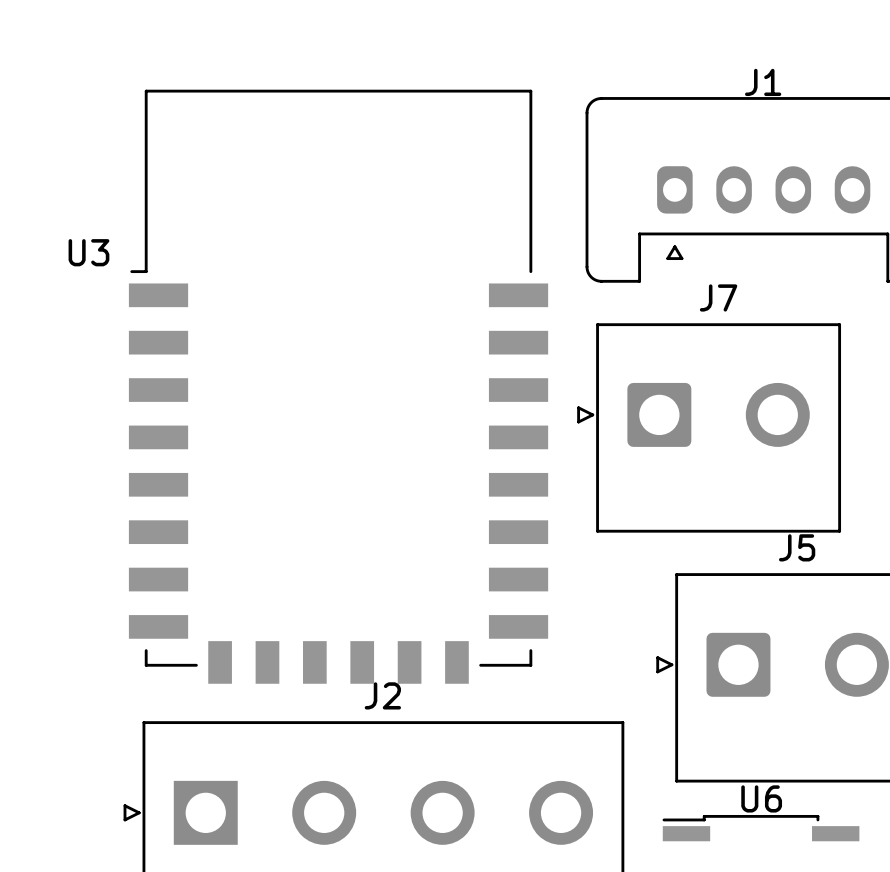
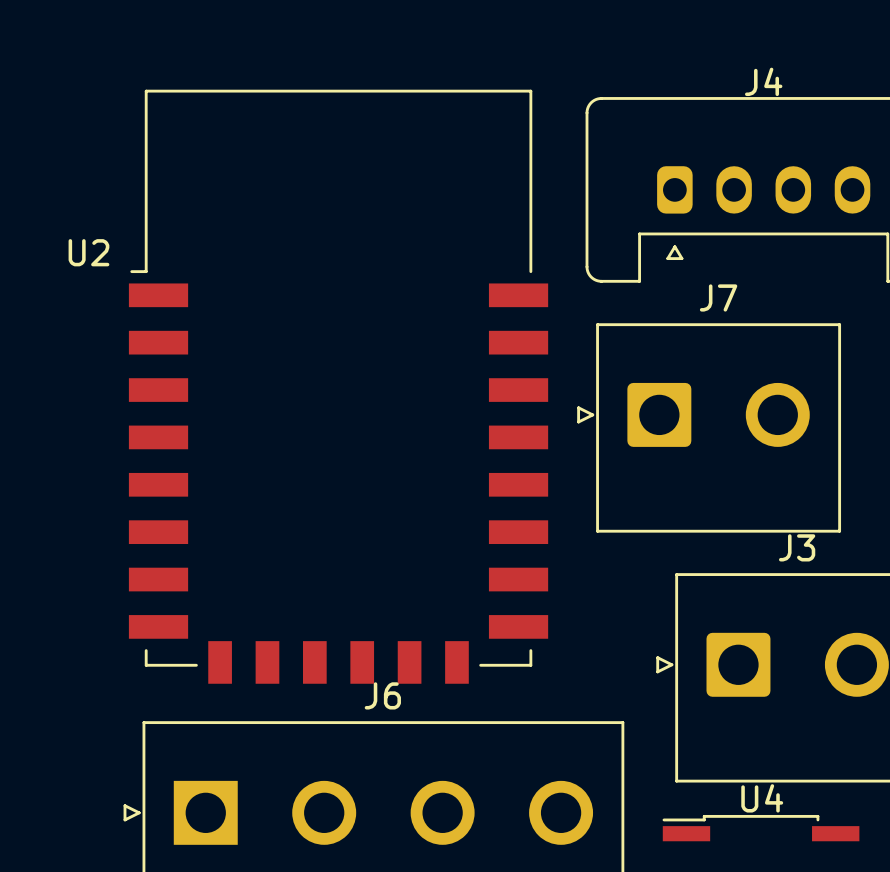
J1 name: J1 (763, 82) -> J4 (763, 81)
U3 name: U3 (88, 252) -> U2 (88, 252)
J5 name: J5 (797, 547) -> J3 (797, 547)
J2 name: J2 (382, 695) -> J6 (382, 695)
U6 name: U6 (761, 798) -> U4 (762, 798)

